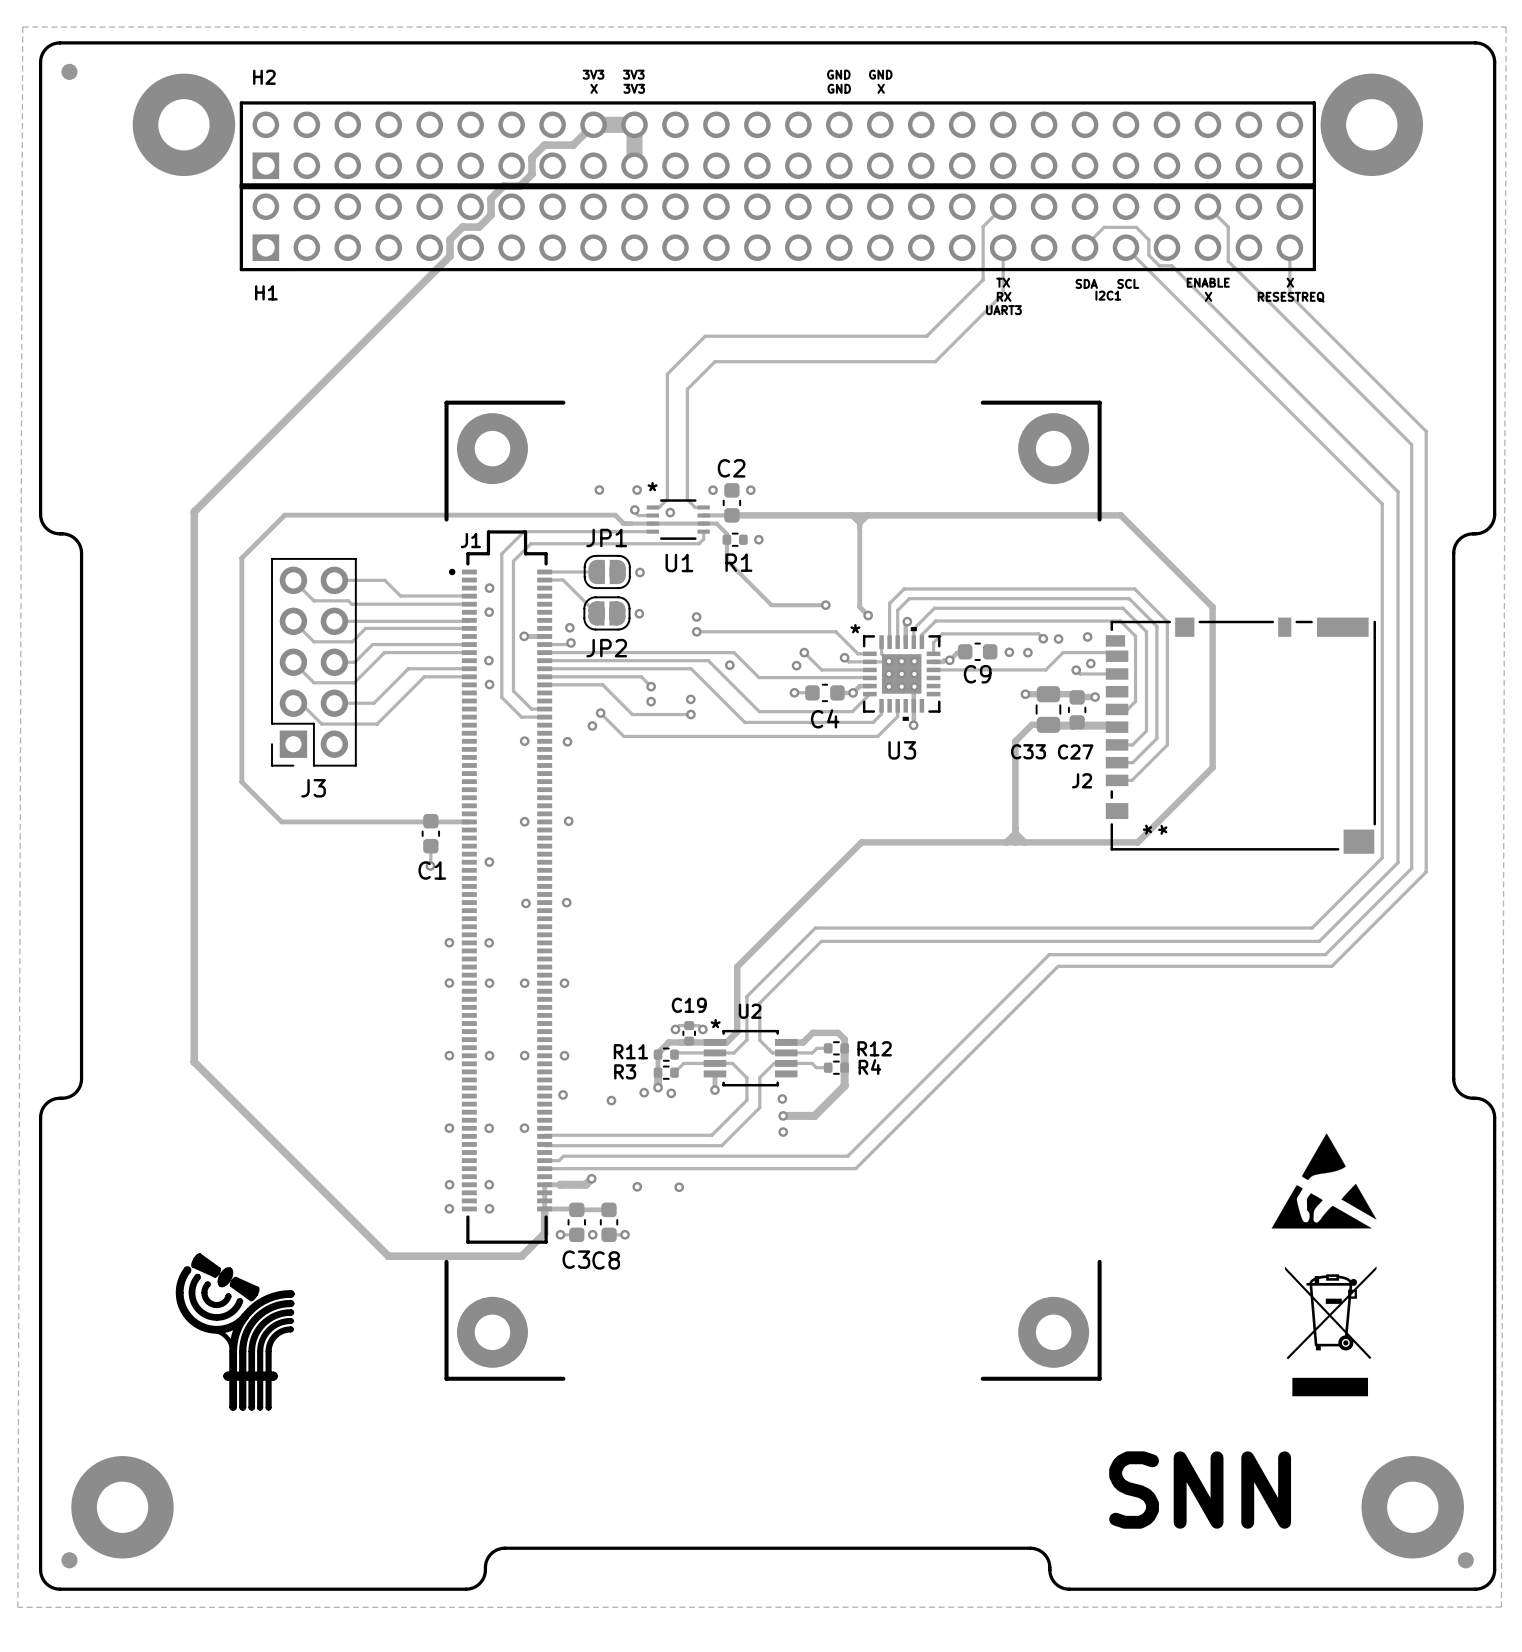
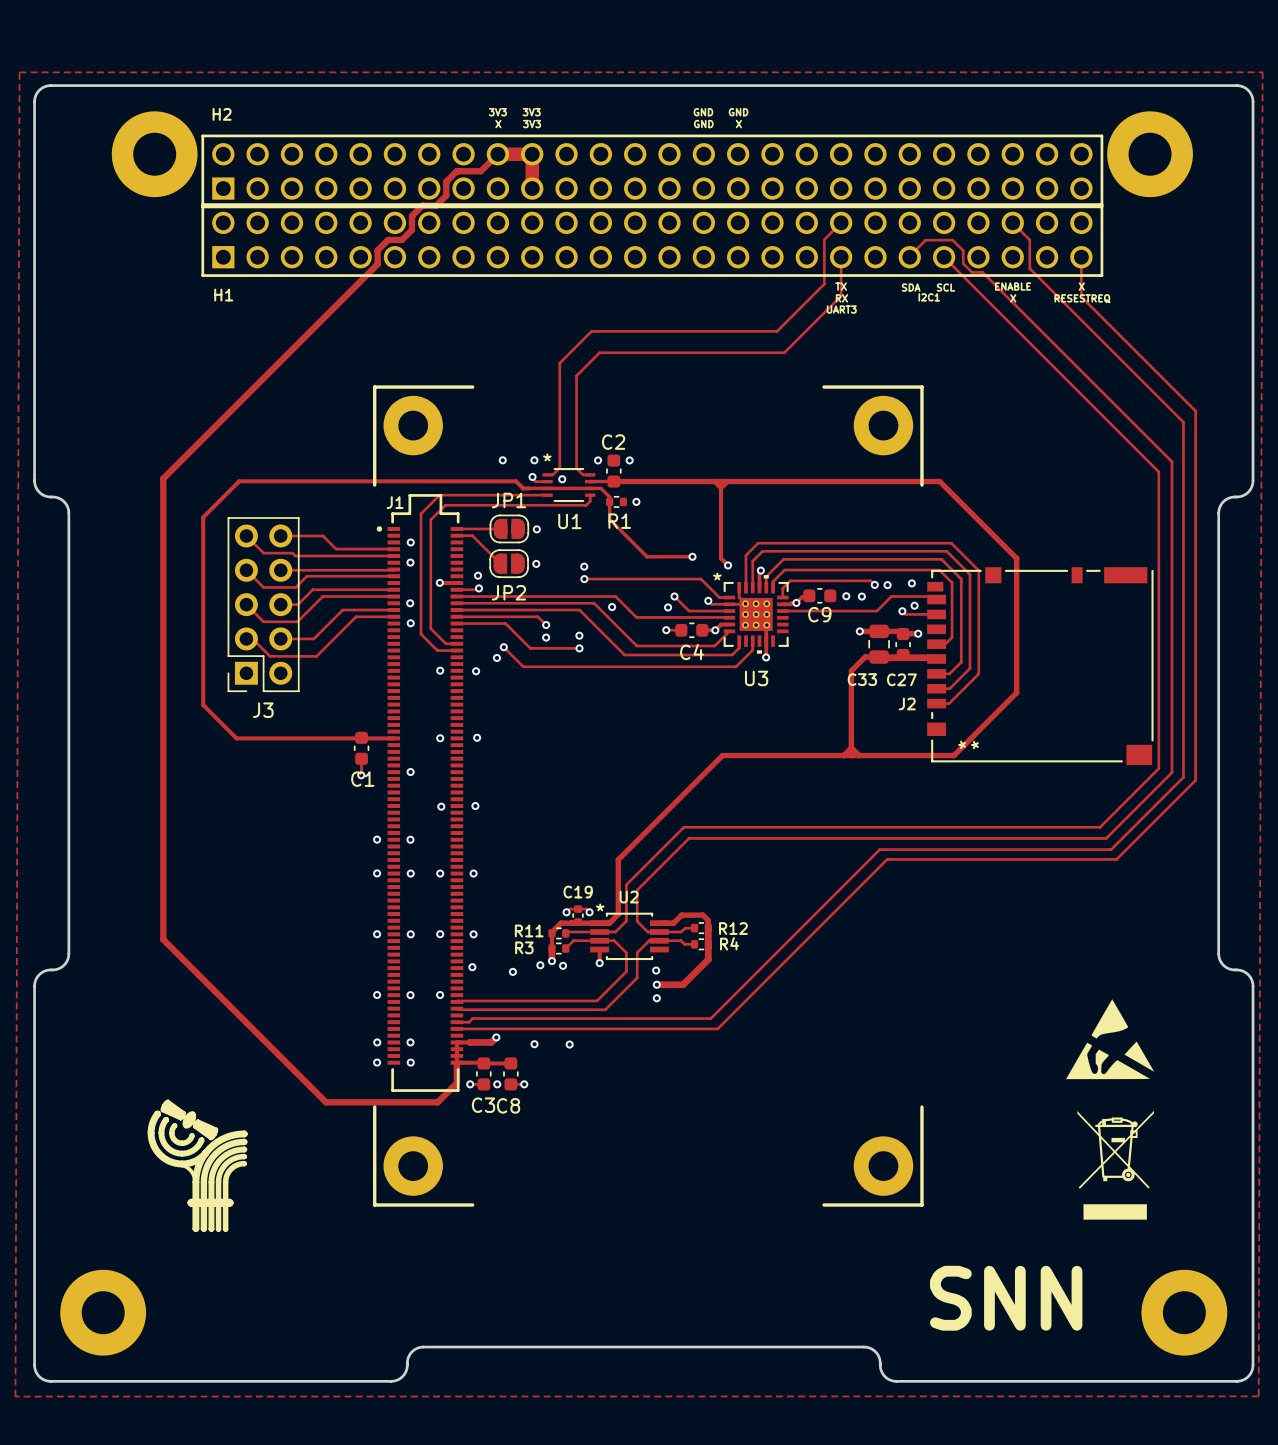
part: (69, 71) -> none
part: (69, 1560) -> none
part: (1465, 1560) -> none

